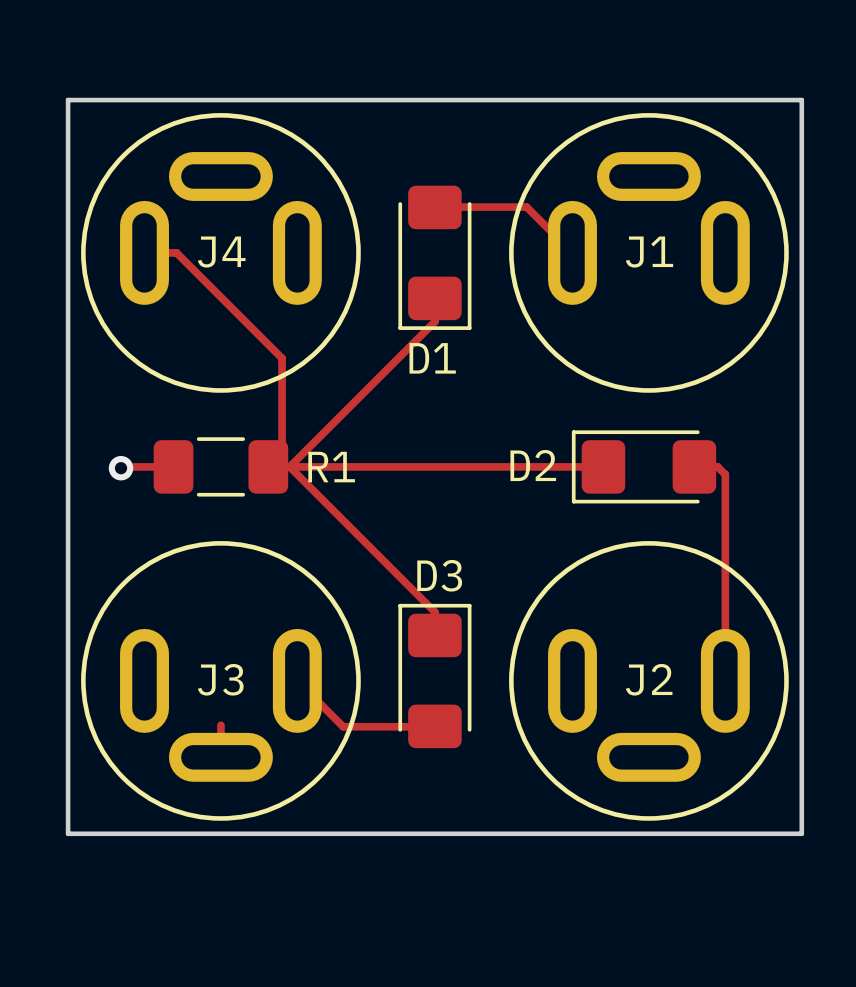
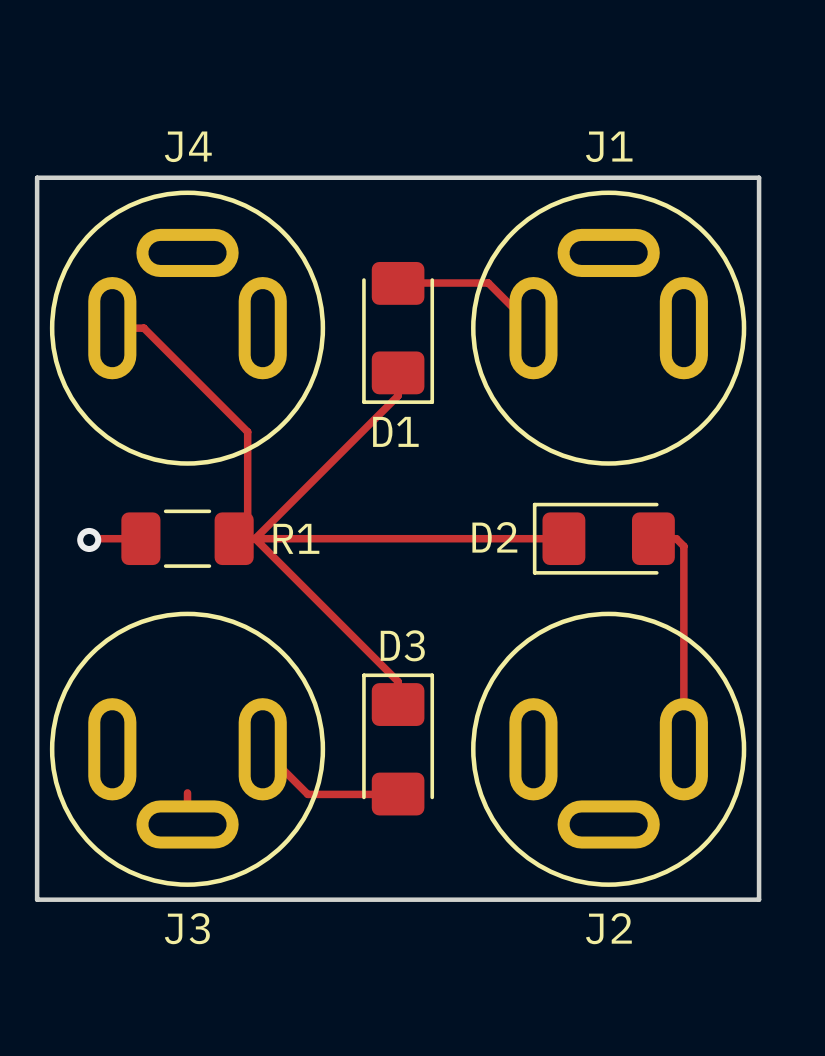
J4 name position: J4 (221, 252) -> J4 (188, 146)
J1 name position: J1 (649, 252) -> J1 (609, 146)
J3 name position: J3 (220, 679) -> J3 (187, 928)
J2 name position: J2 (649, 679) -> J2 (608, 928)

